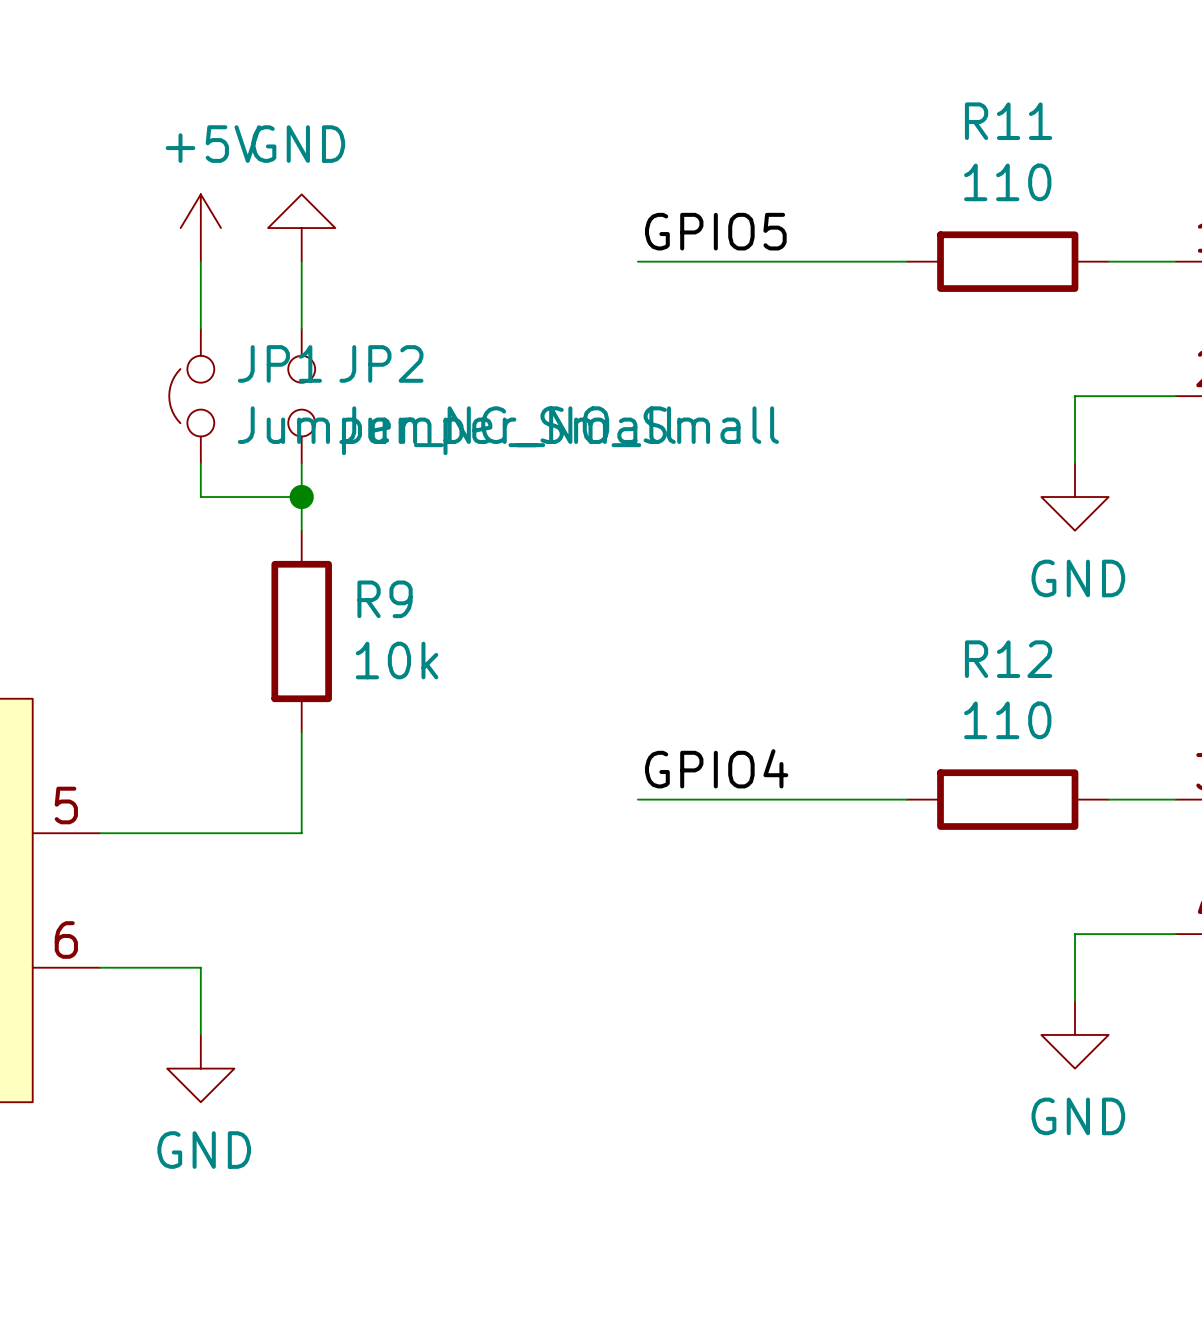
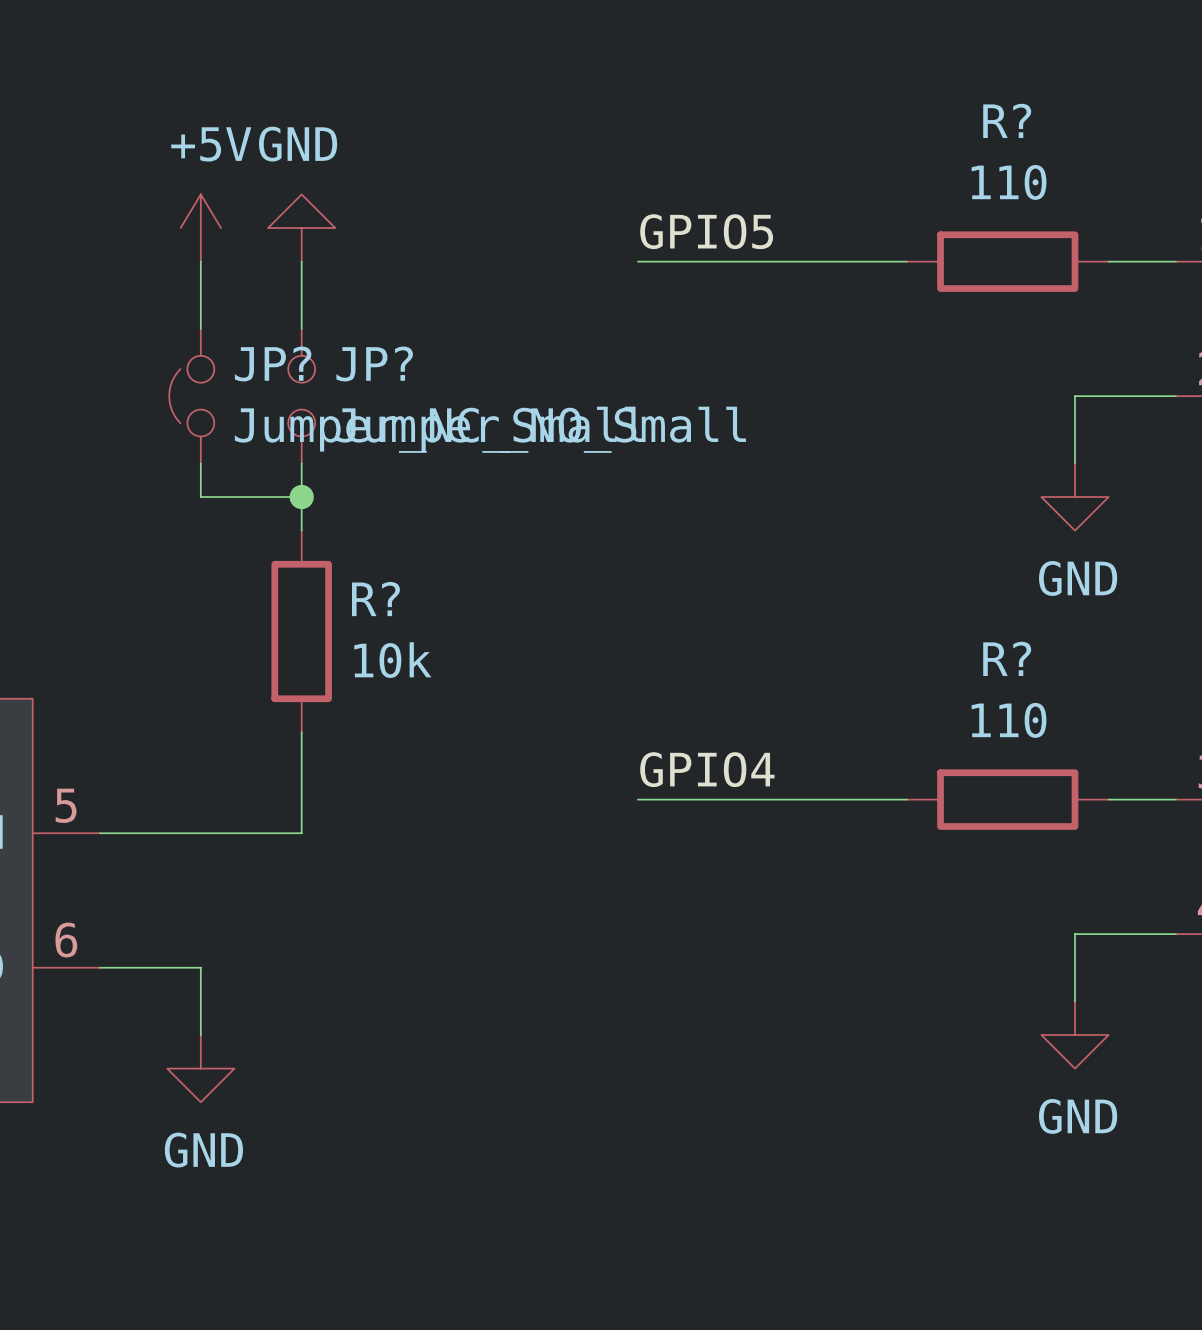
R11 name: R11 (1008, 121) -> R? (1007, 120)
JP1 name: JP1 (279, 363) -> JP? (273, 363)
JP2 name: JP2 (381, 363) -> JP? (374, 363)
R9 name: R9 (385, 599) -> R? (375, 599)
R12 name: R12 (1008, 659) -> R? (1007, 658)

